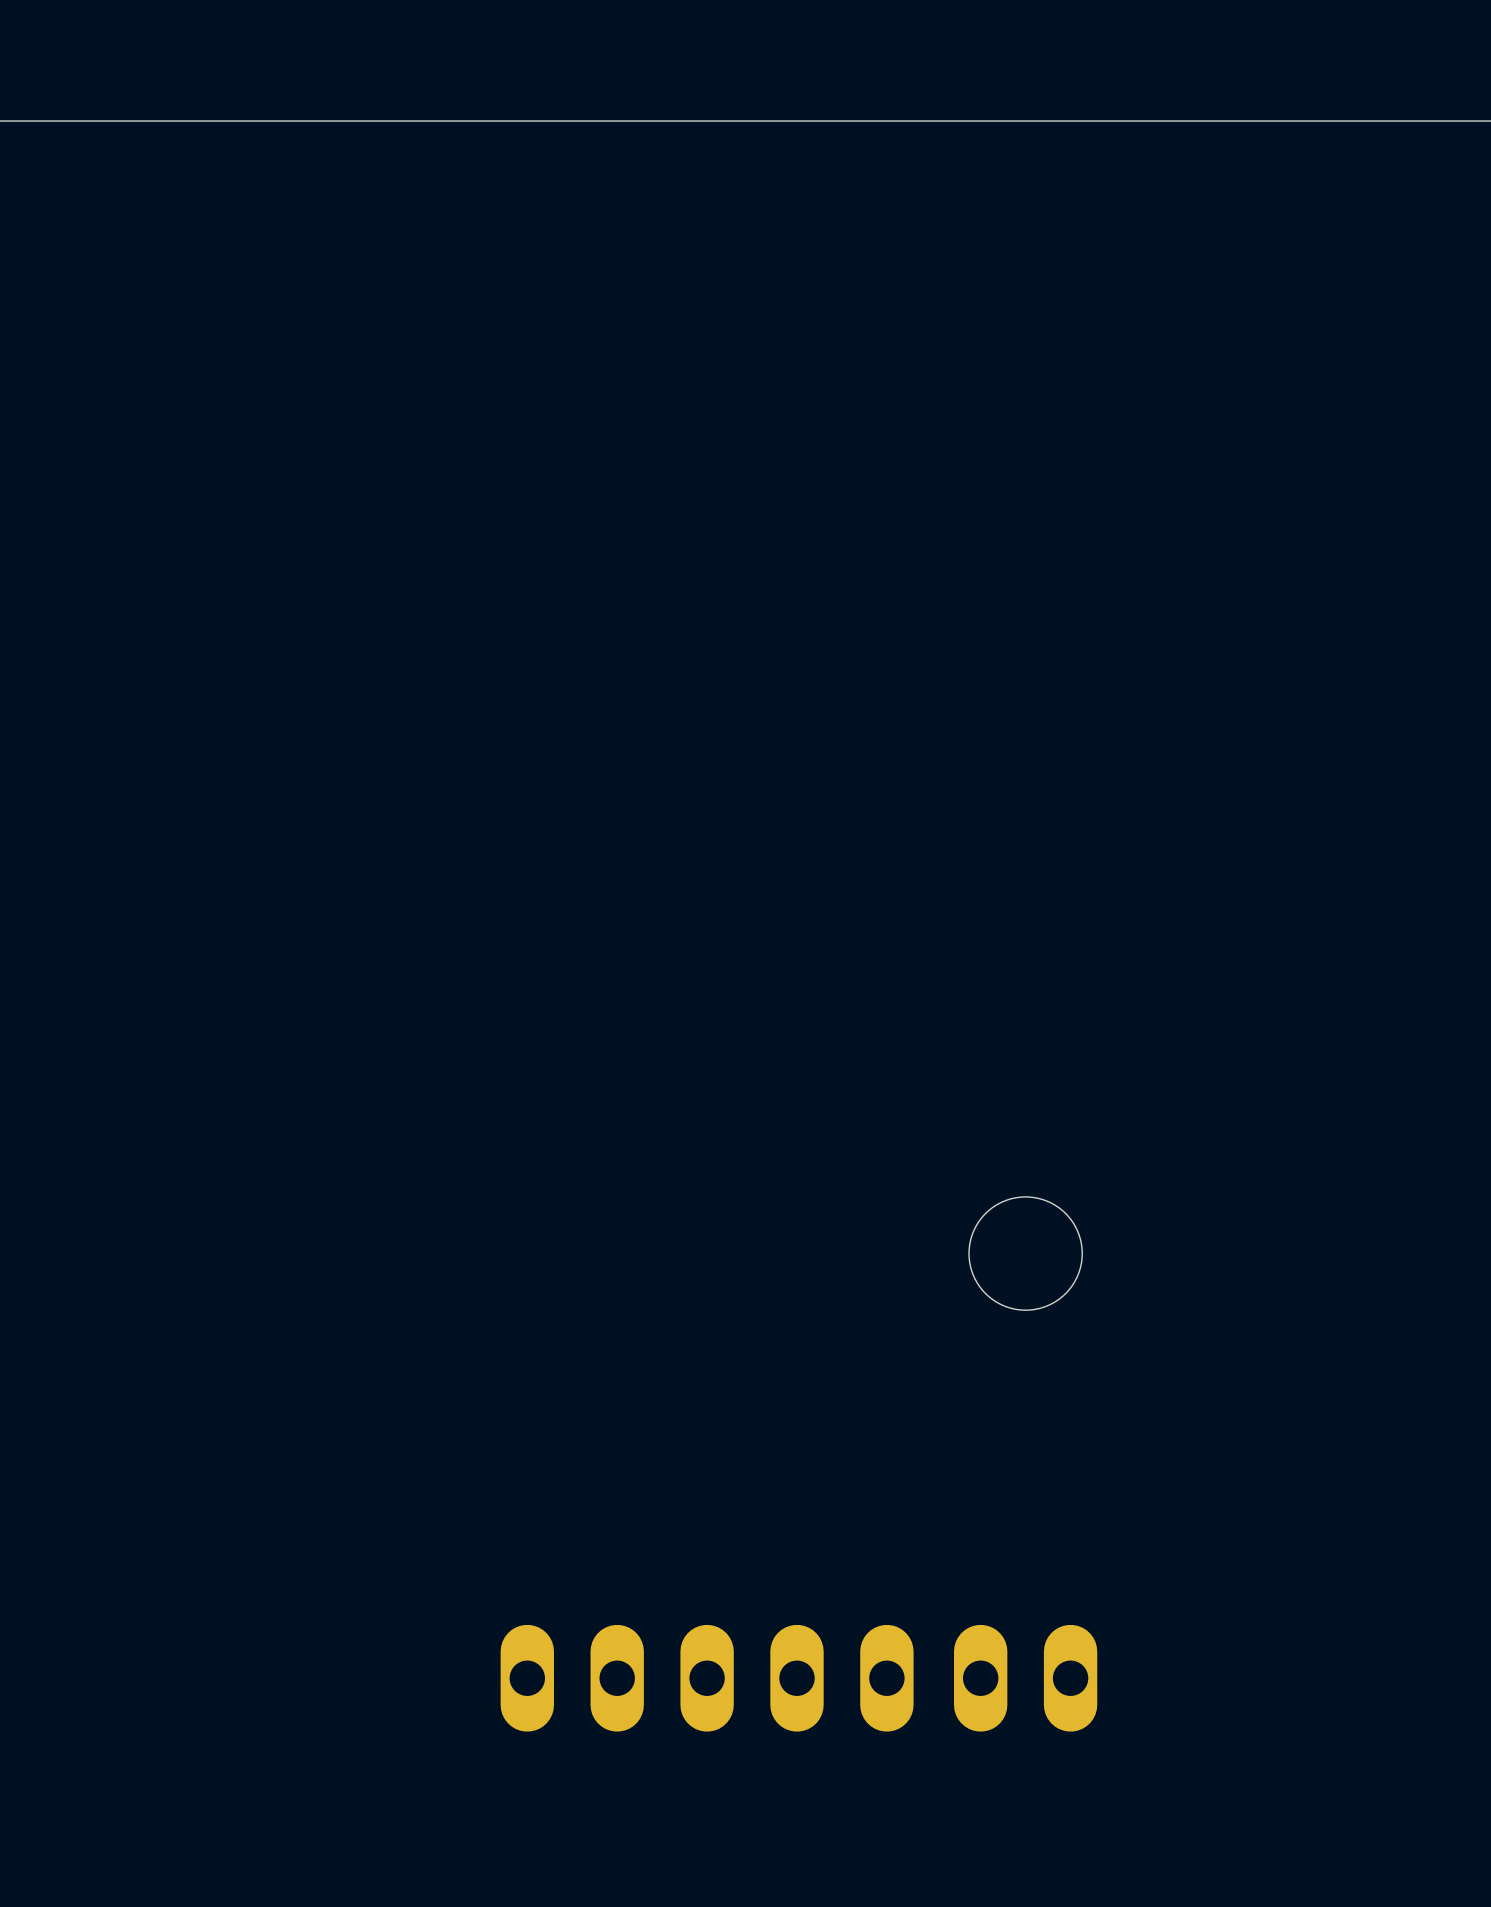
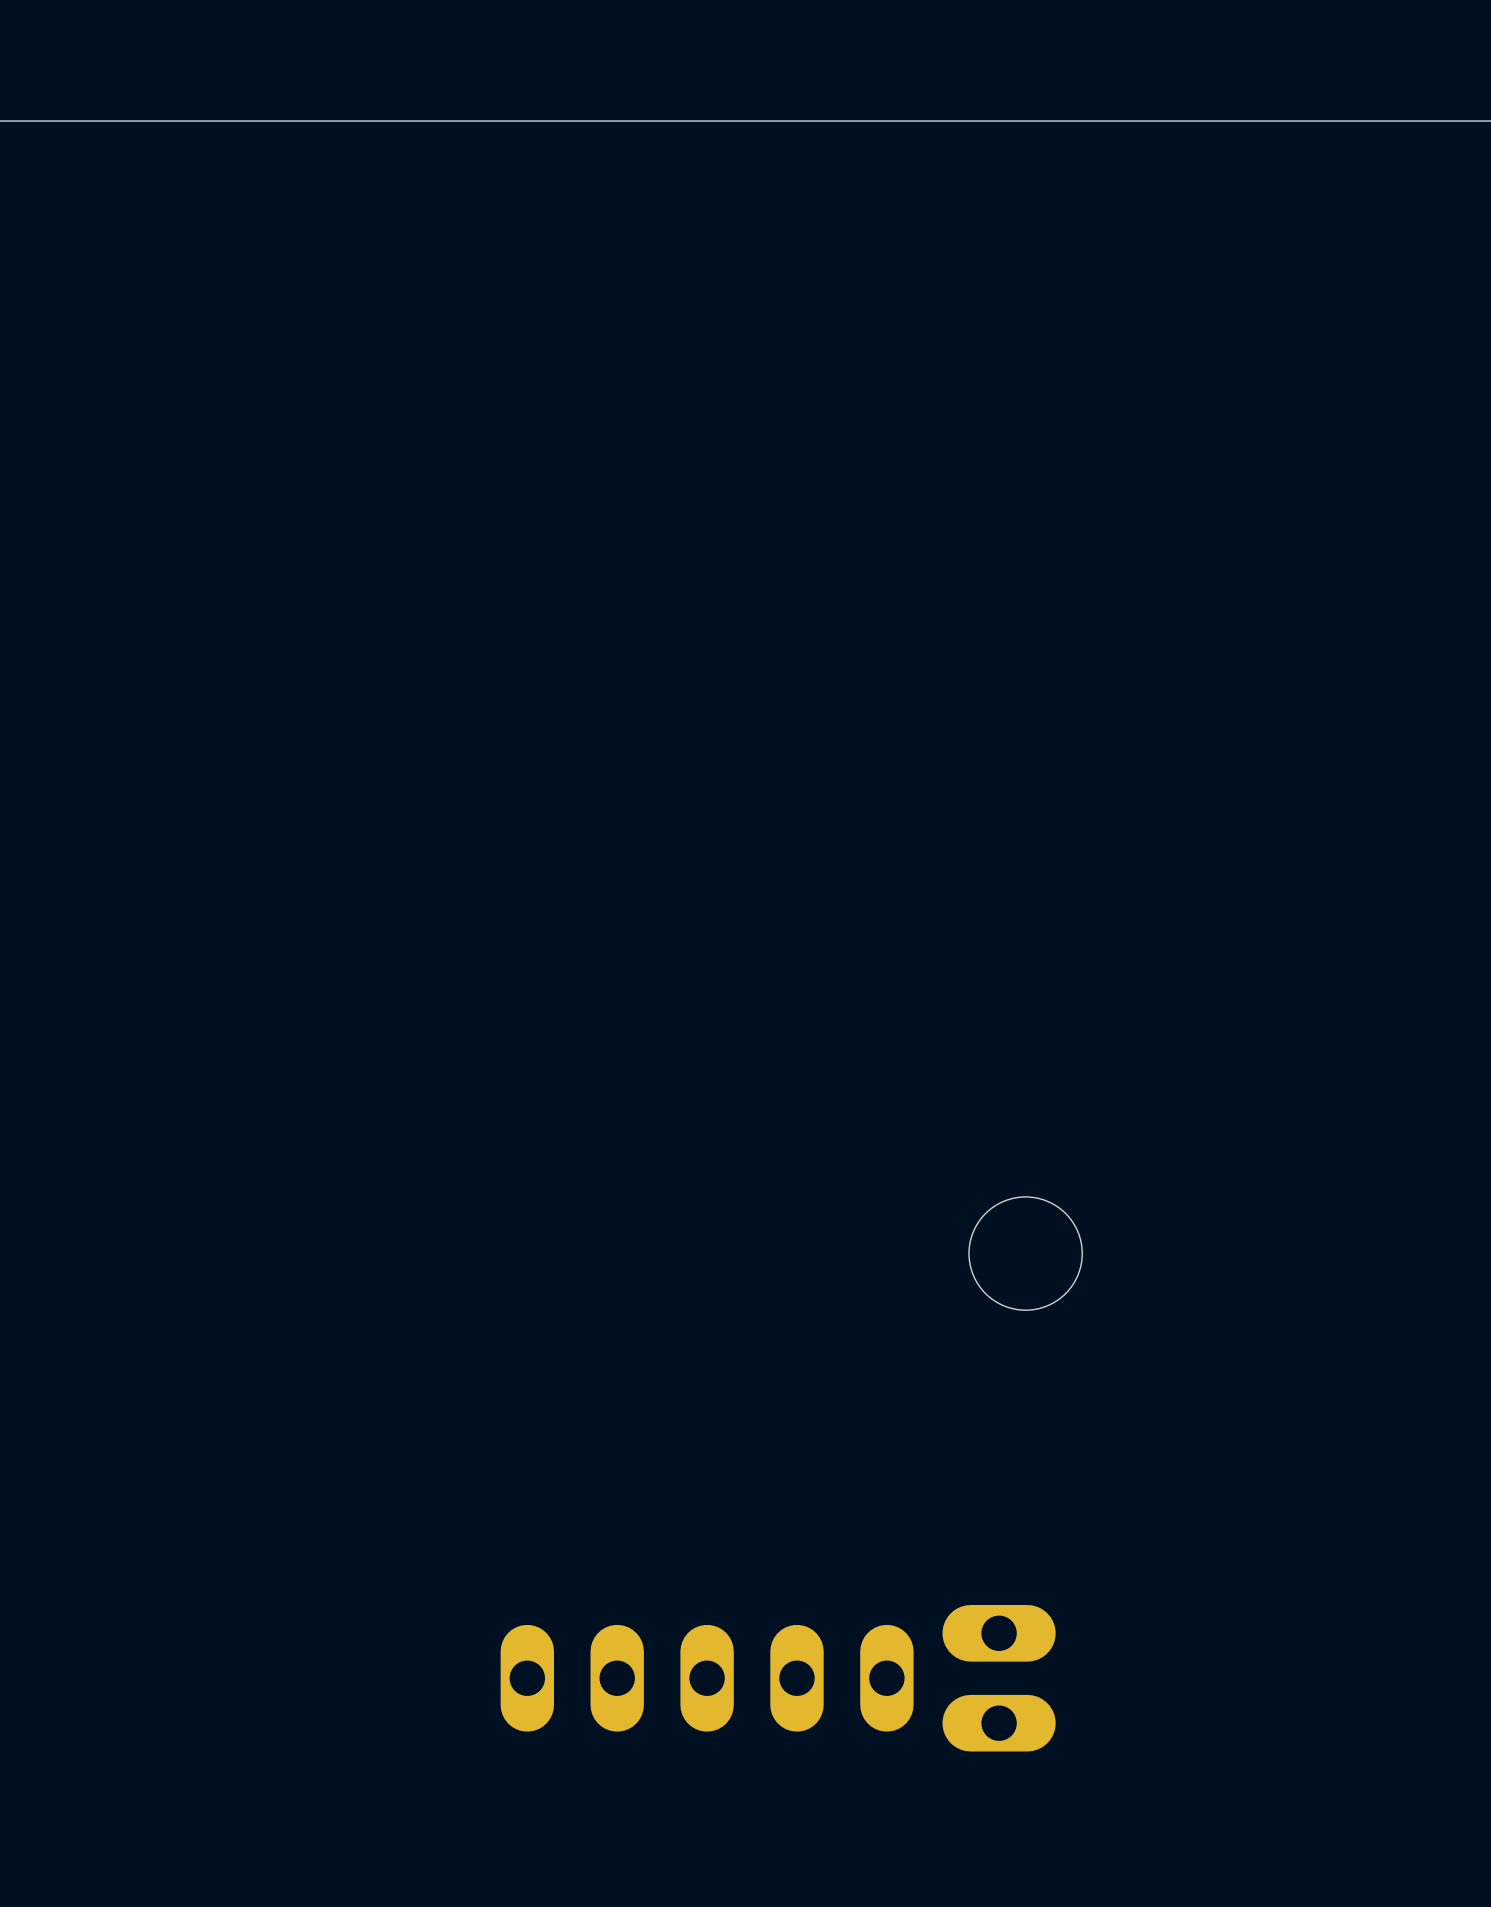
part footprint: [953, 1624, 1098, 1732] -> [942, 1604, 1056, 1752]

